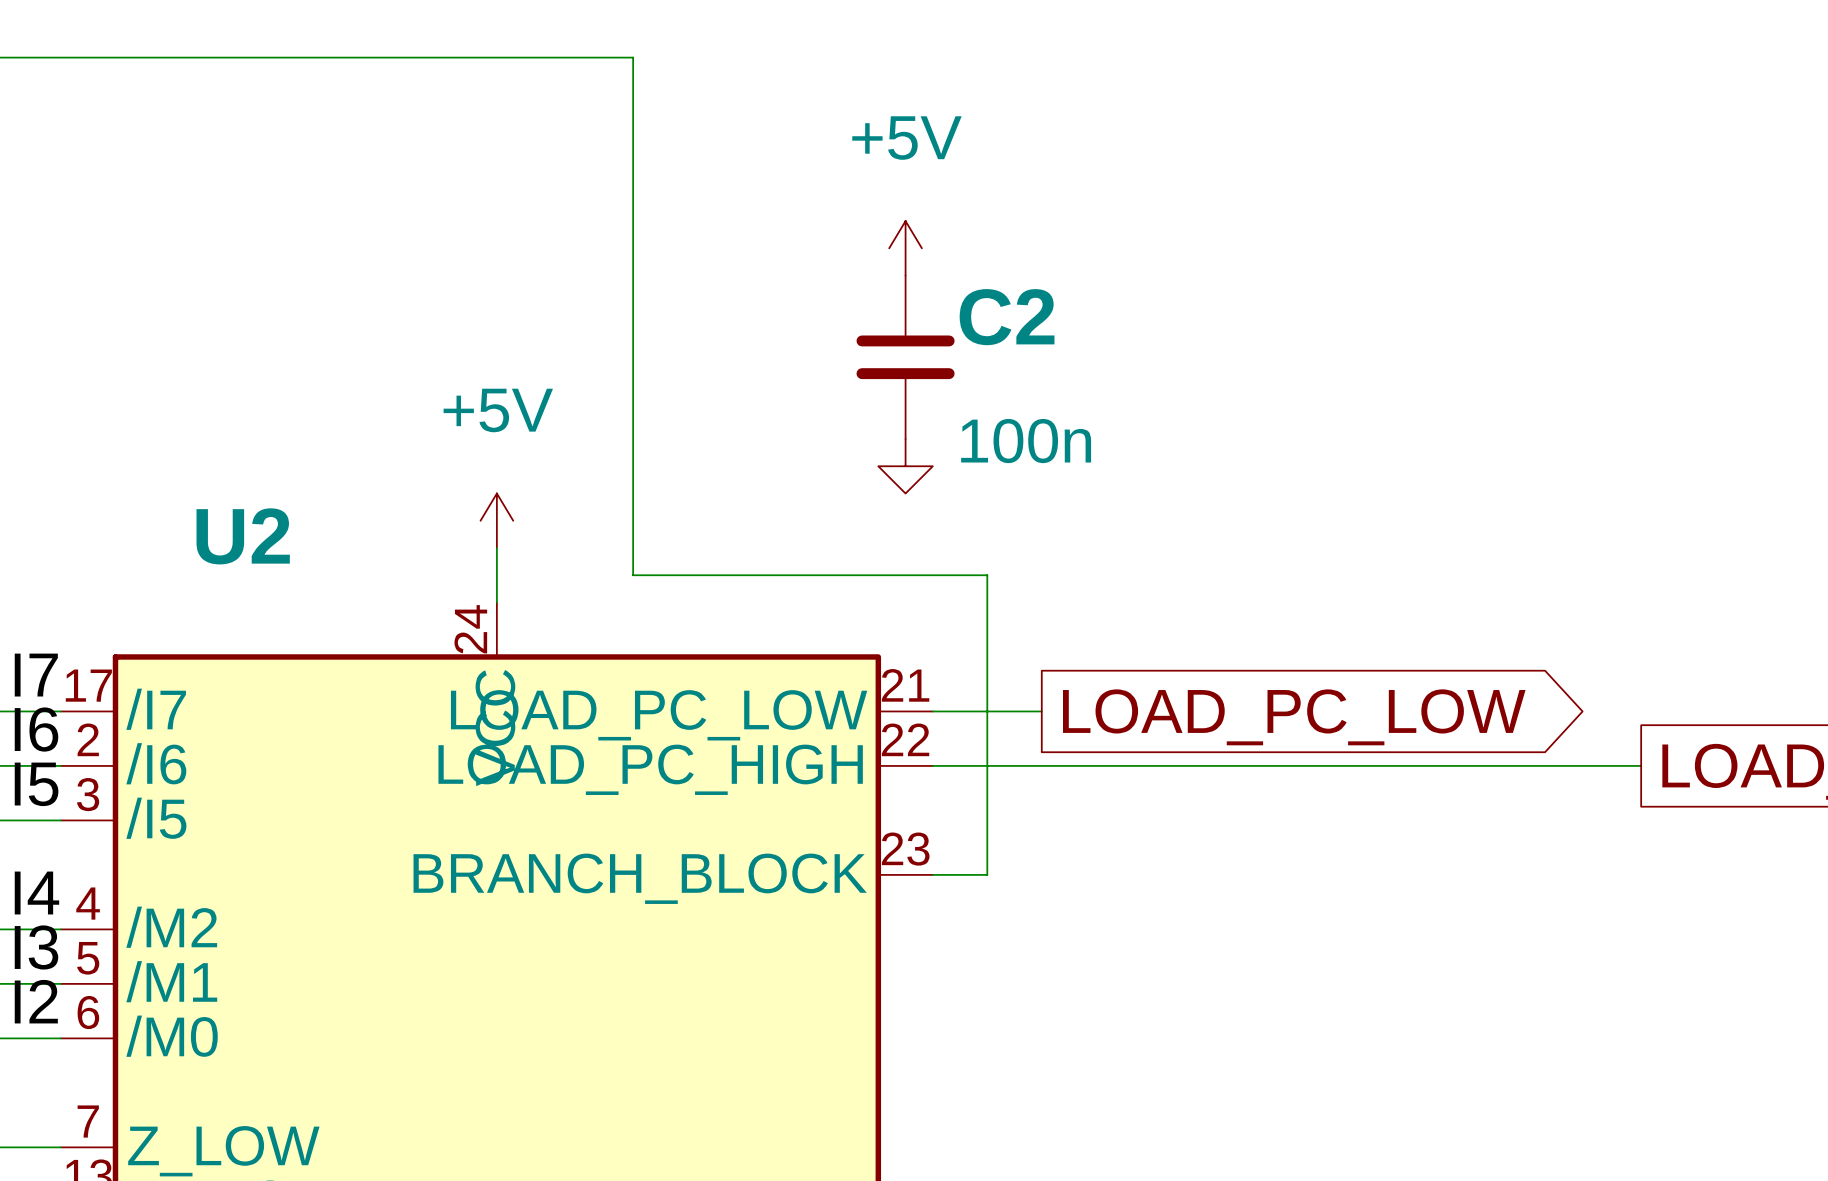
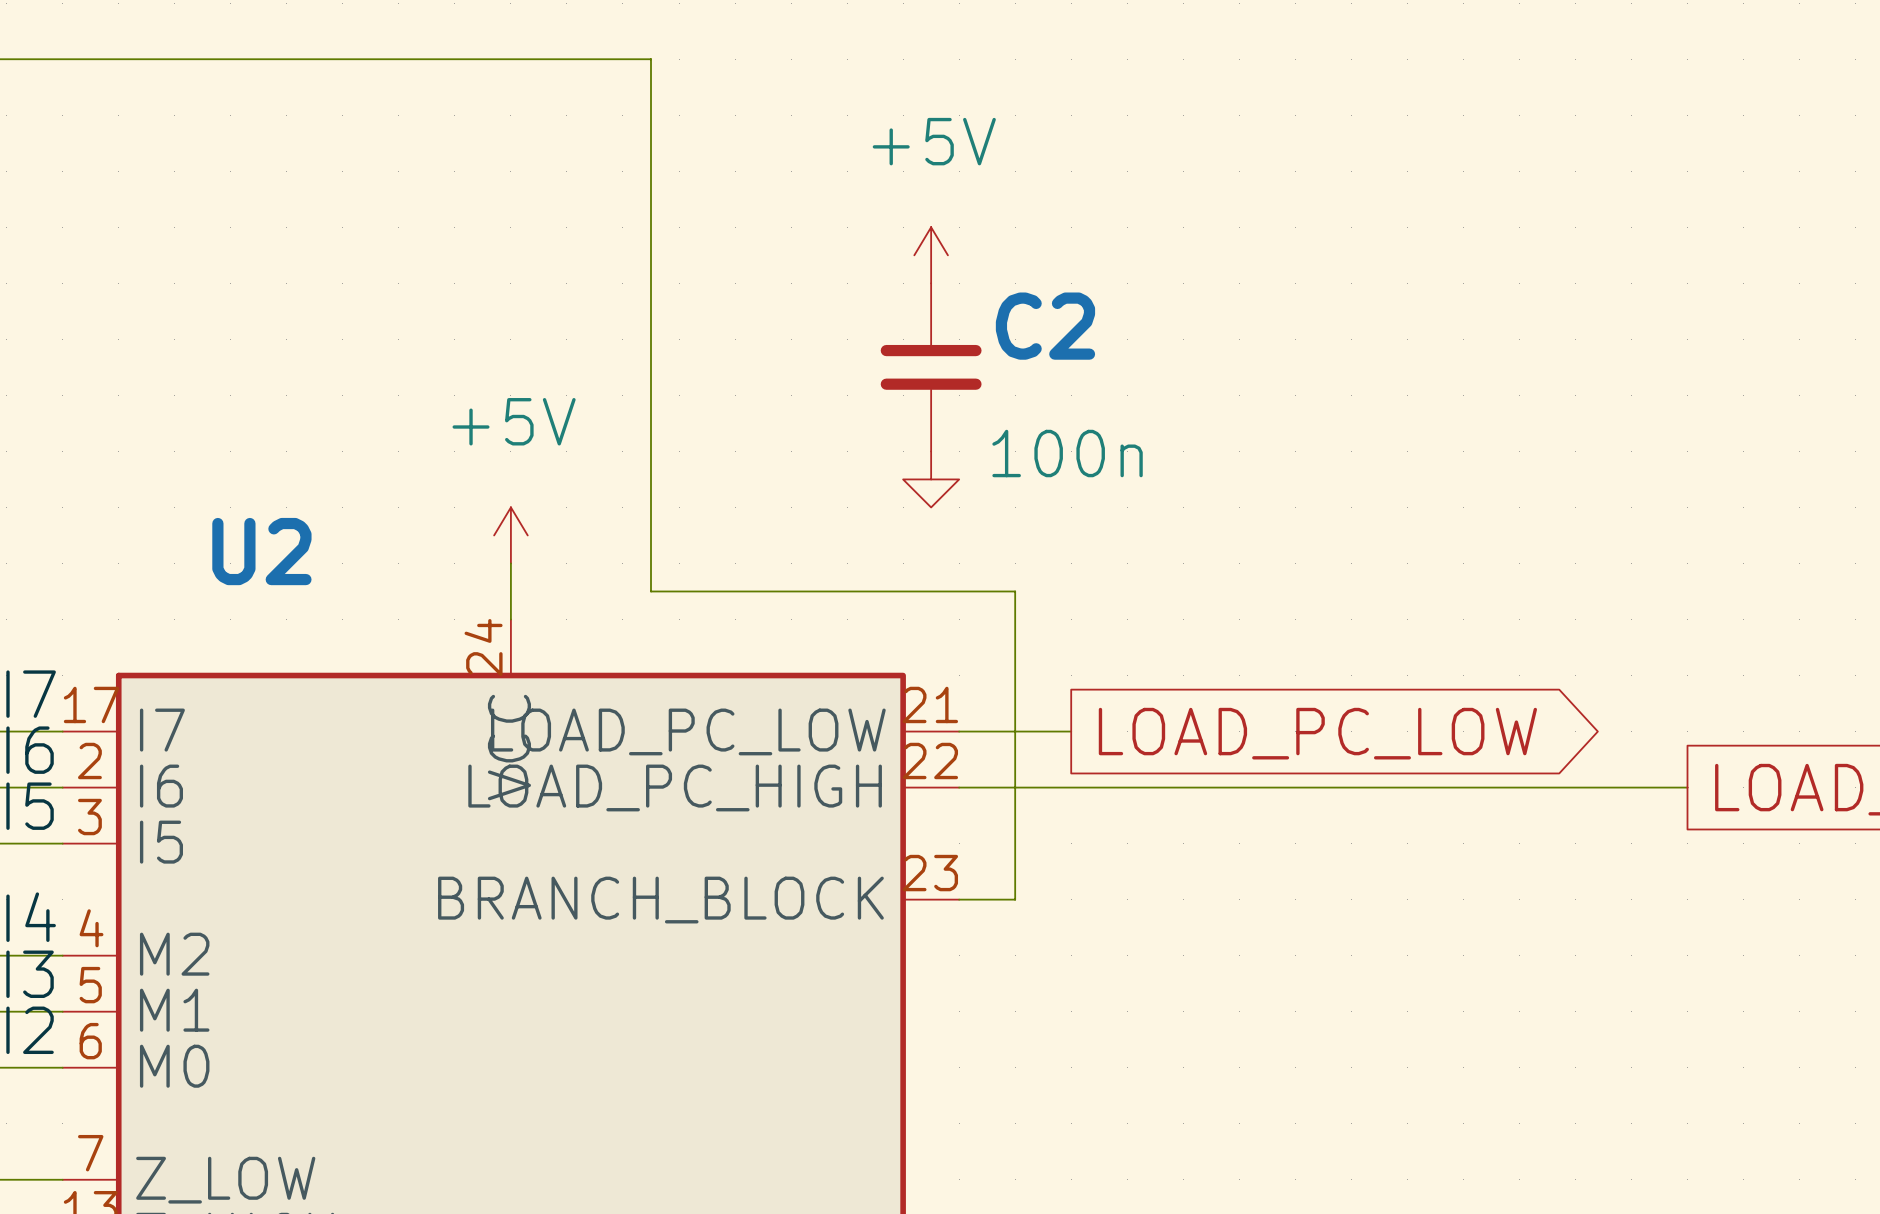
U2 pin name: /I7 (156, 709) -> I7 (162, 730)
U2 pin name: /I6 (156, 763) -> I6 (161, 786)
U2 pin name: /I5 (156, 818) -> I5 (161, 842)
U2 pin name: /M2 (171, 927) -> M2 (174, 954)
U2 pin name: /M1 (171, 981) -> M1 (174, 1010)
U2 pin name: /M0 (172, 1036) -> M0 (174, 1066)

